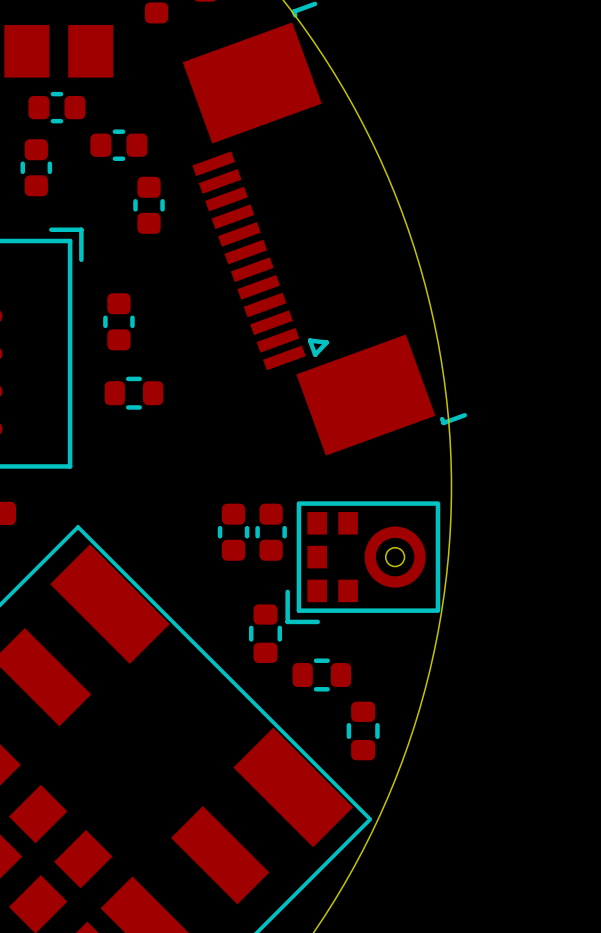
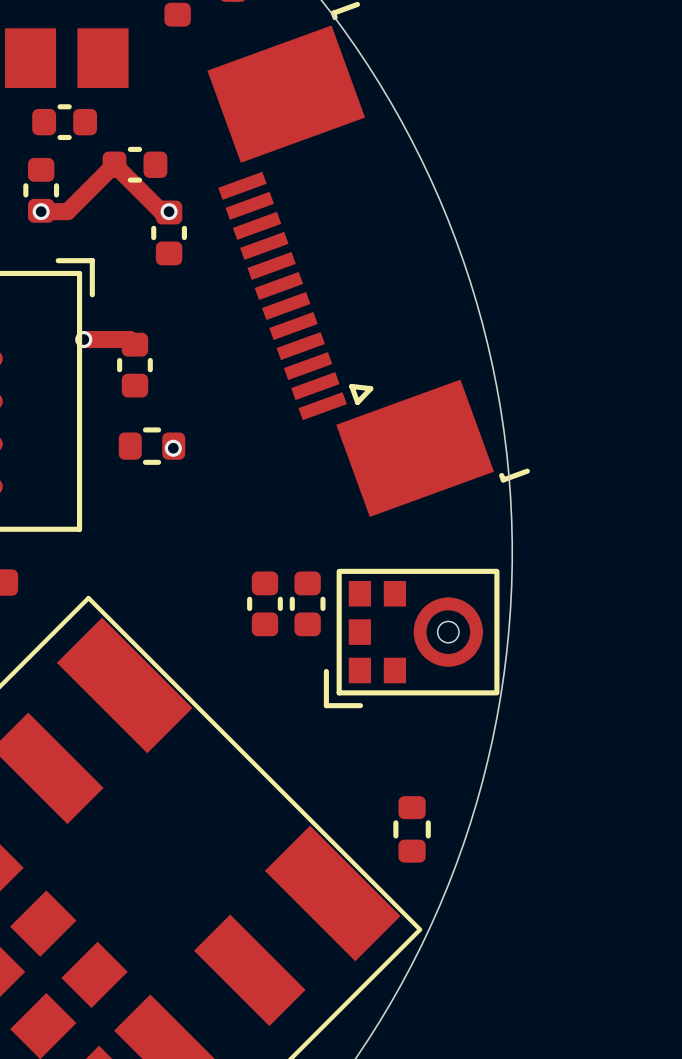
track: none -> (41, 211) (67, 211) (114, 164) (162, 212) (169, 212)
via: none -> (41, 211)
via: none -> (169, 211)
track: none -> (83, 339) (129, 339) (134, 344)
via: none -> (83, 339)
via: none -> (173, 448)
part: (265, 633) -> none
part: (321, 674) -> none

